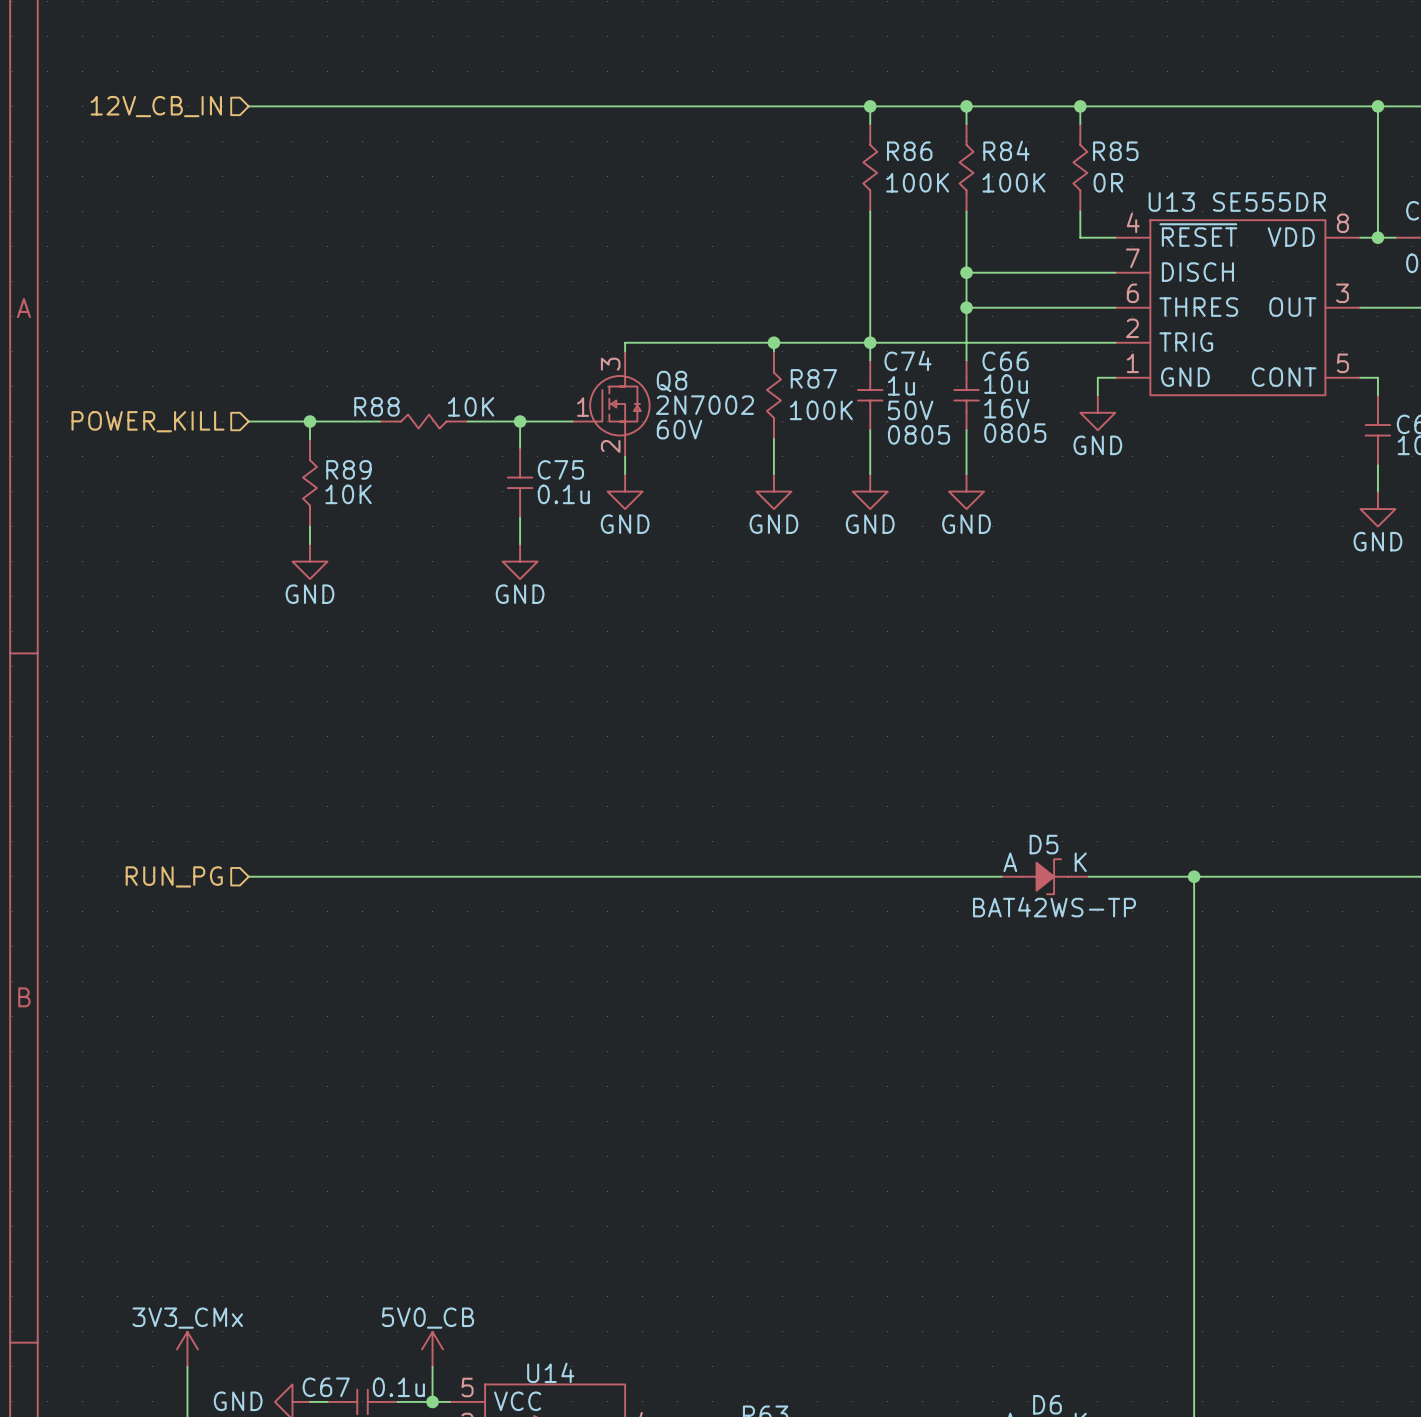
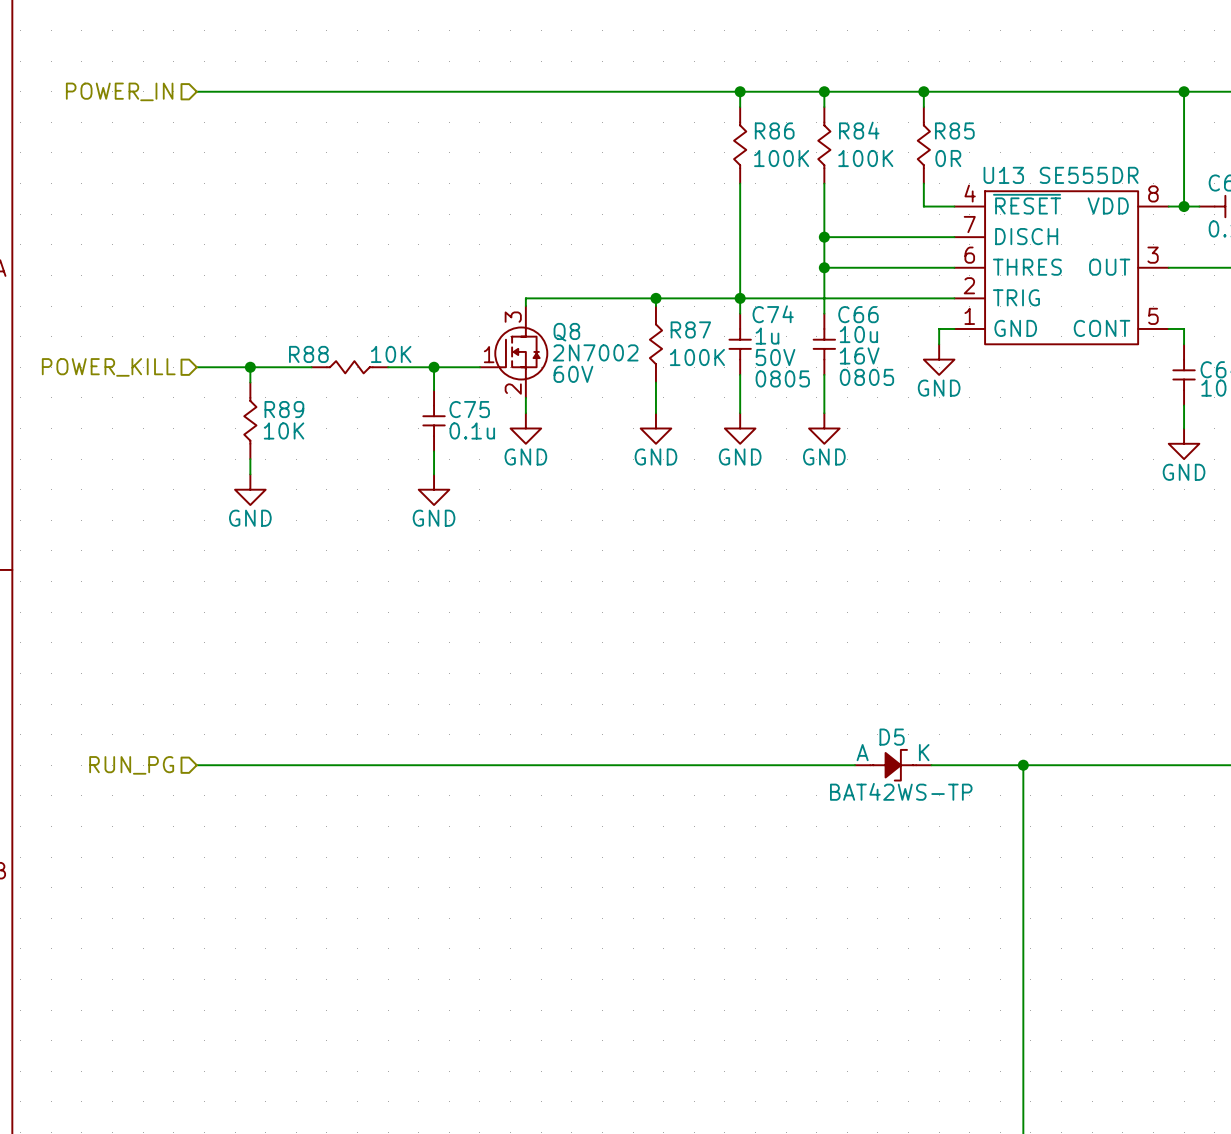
hierarchical label: 12V_CB_IN (156, 106) -> POWER_IN (119, 91)

